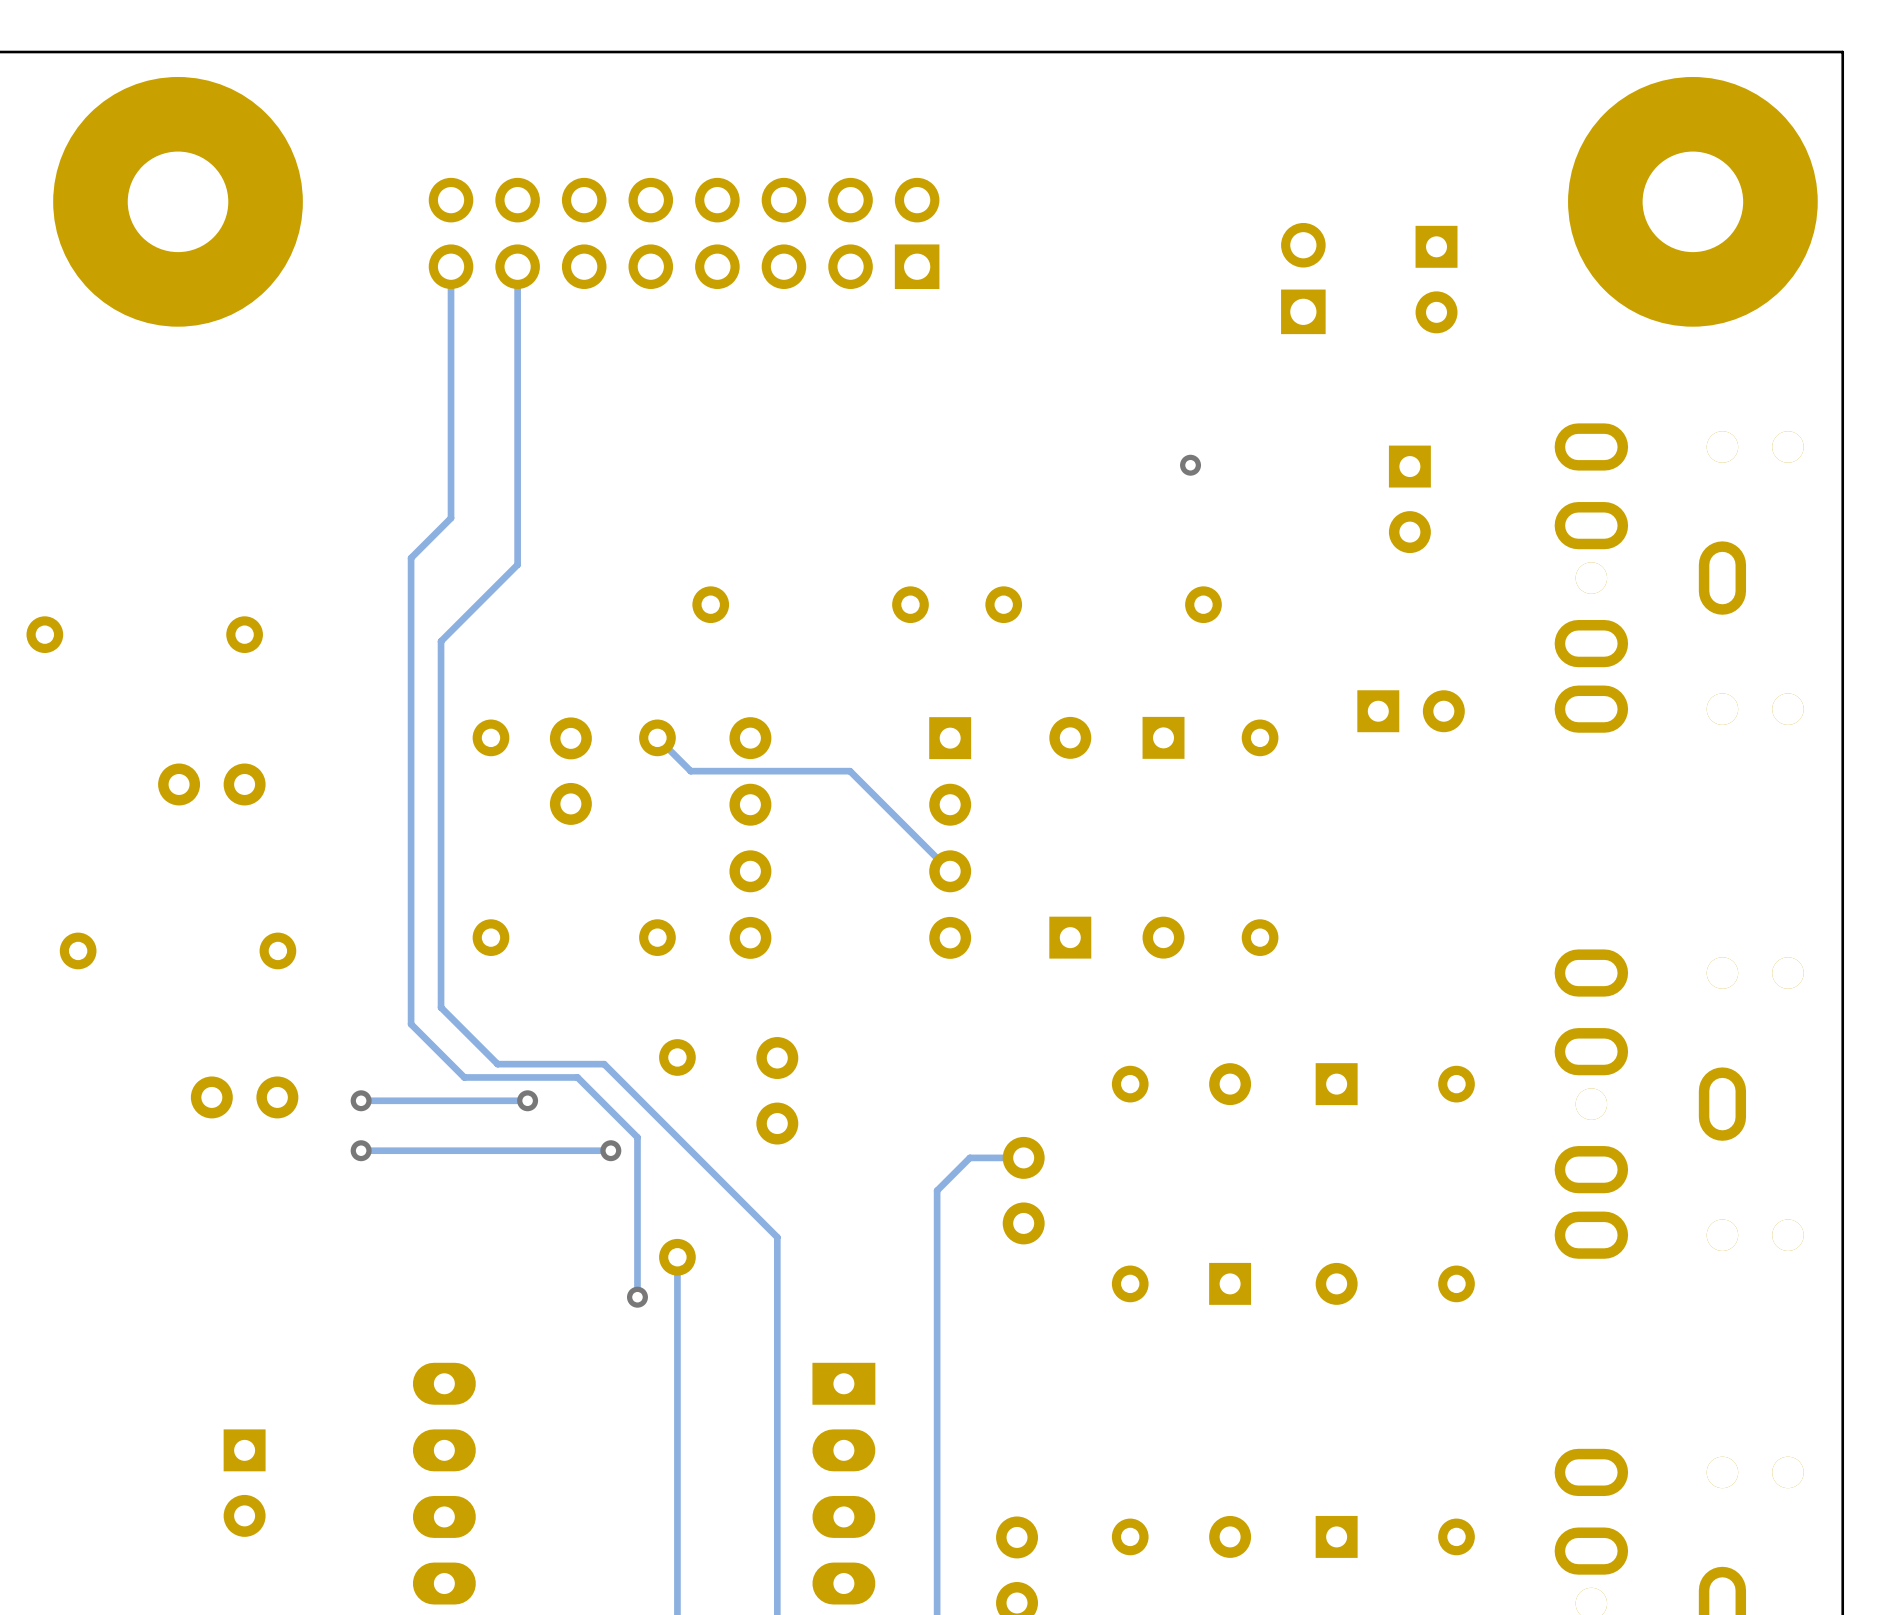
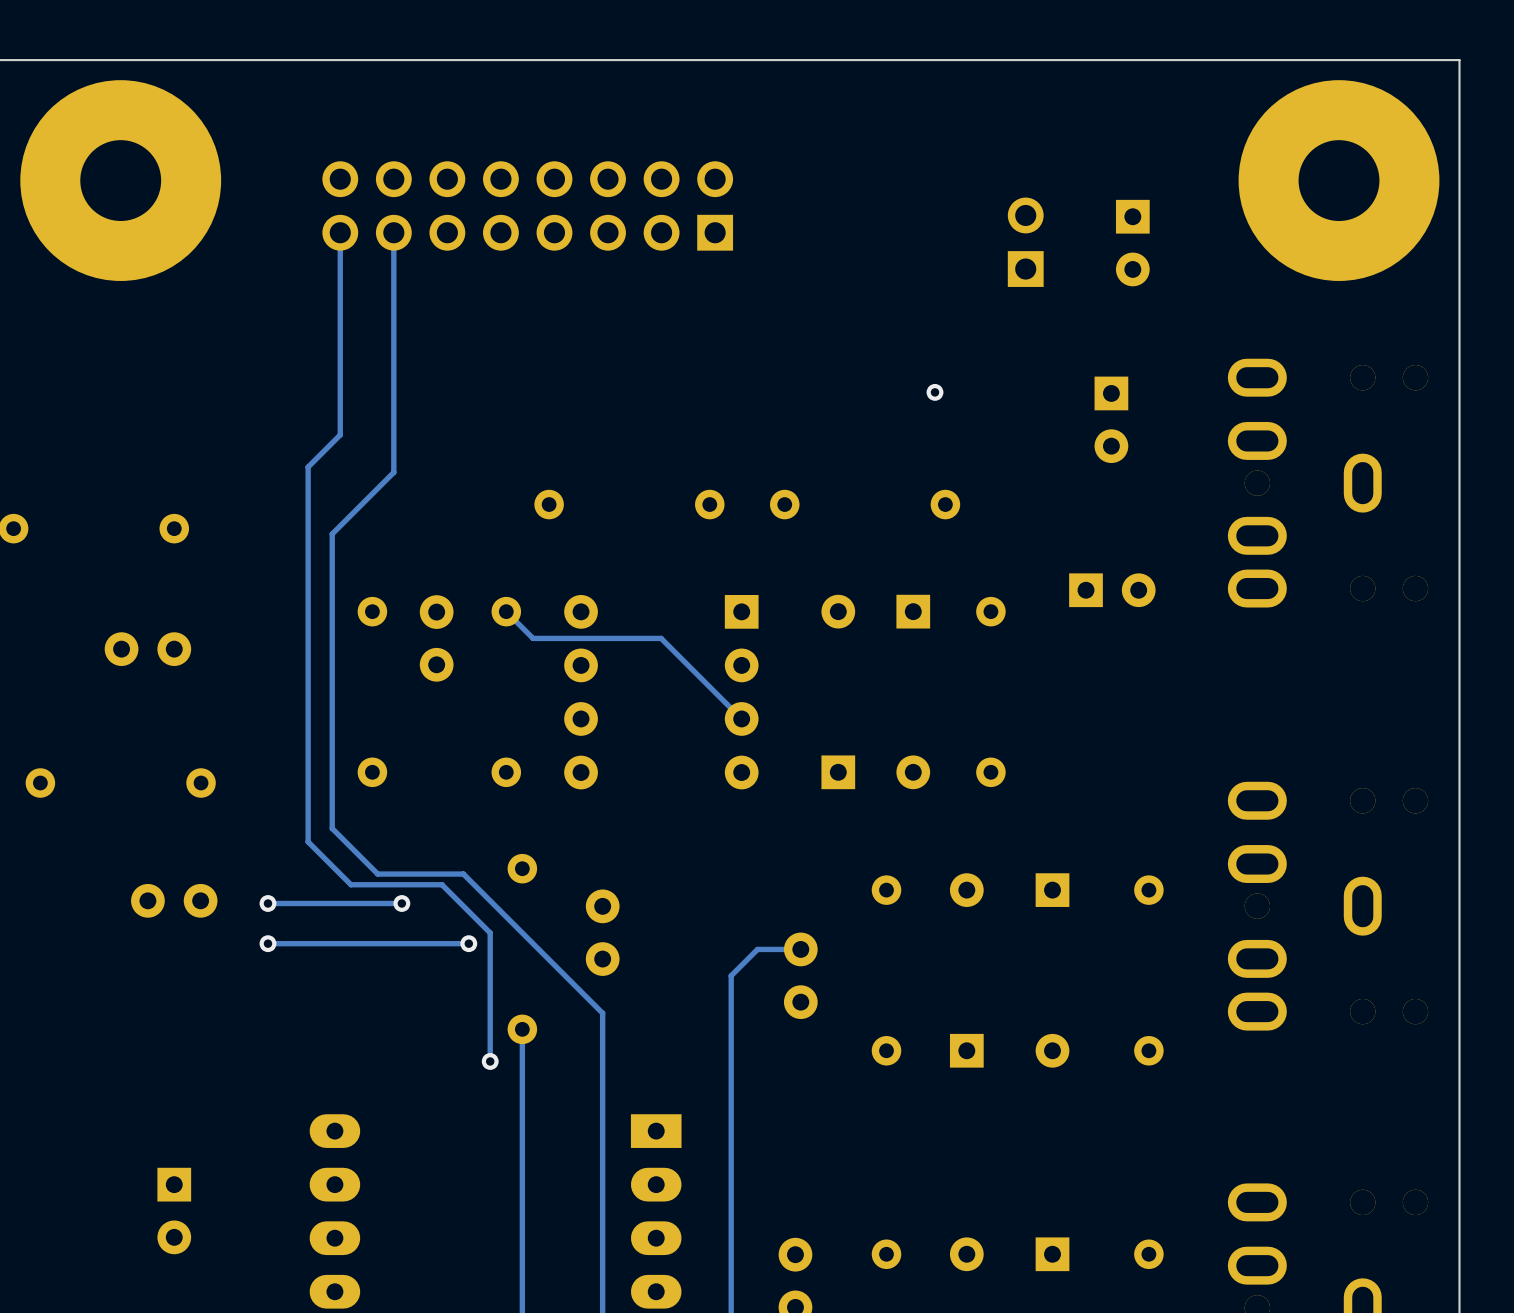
part position: (777, 1090) -> (602, 932)

